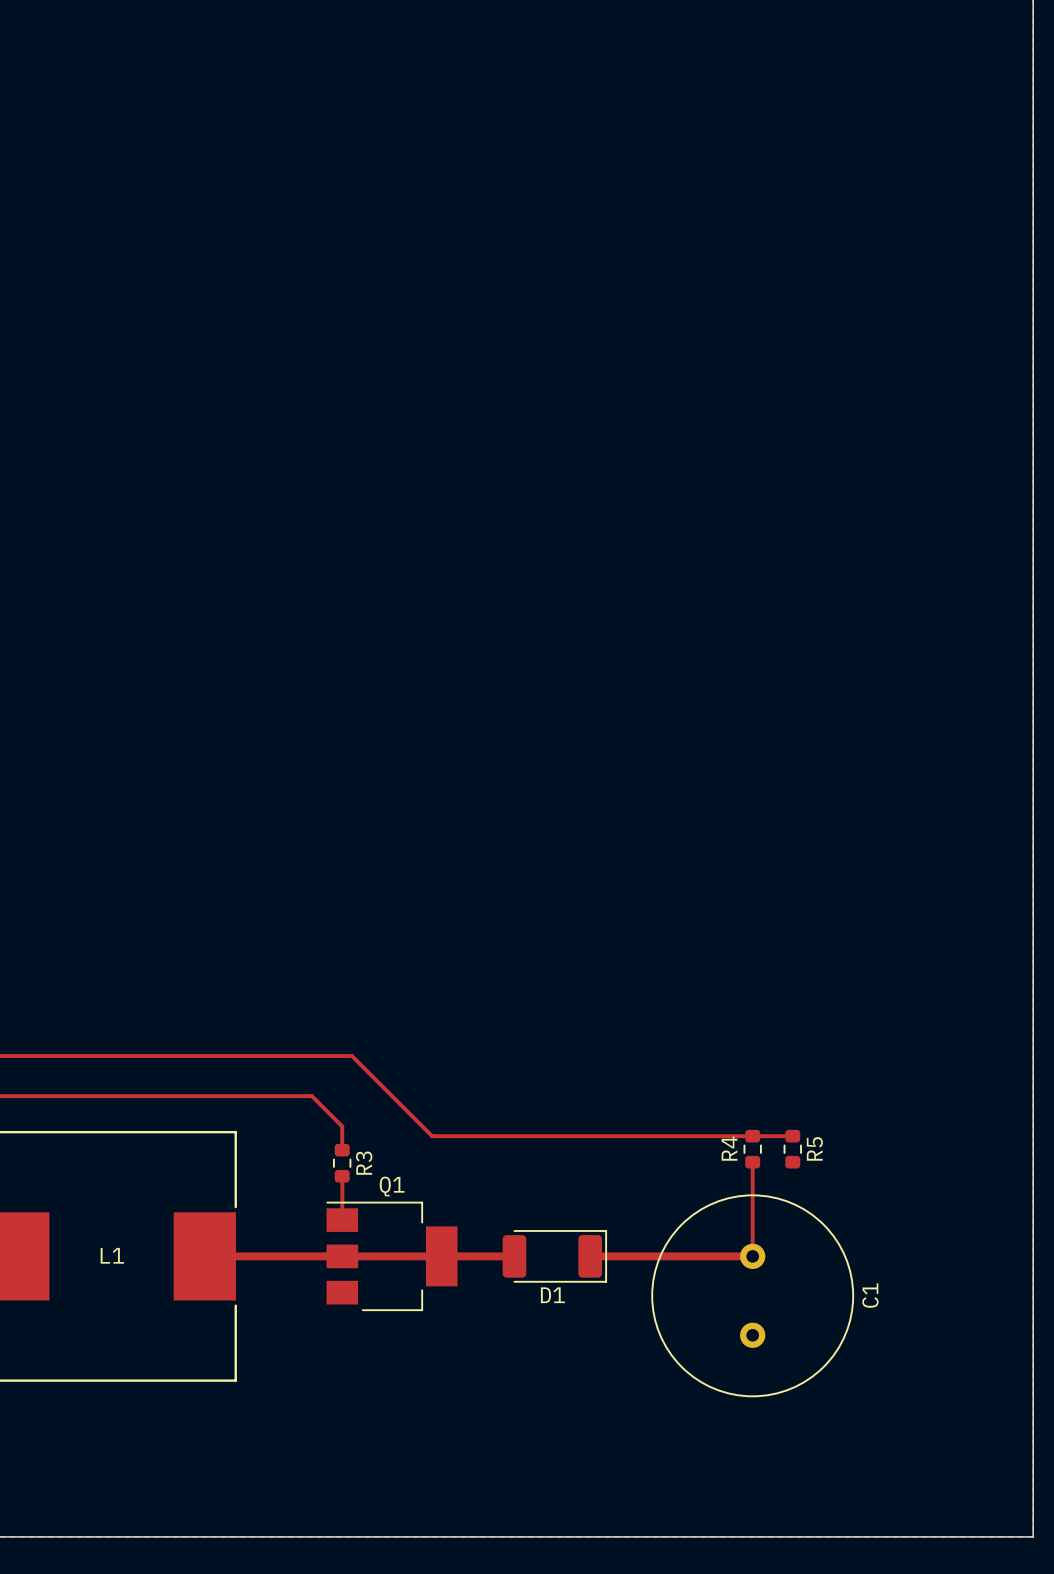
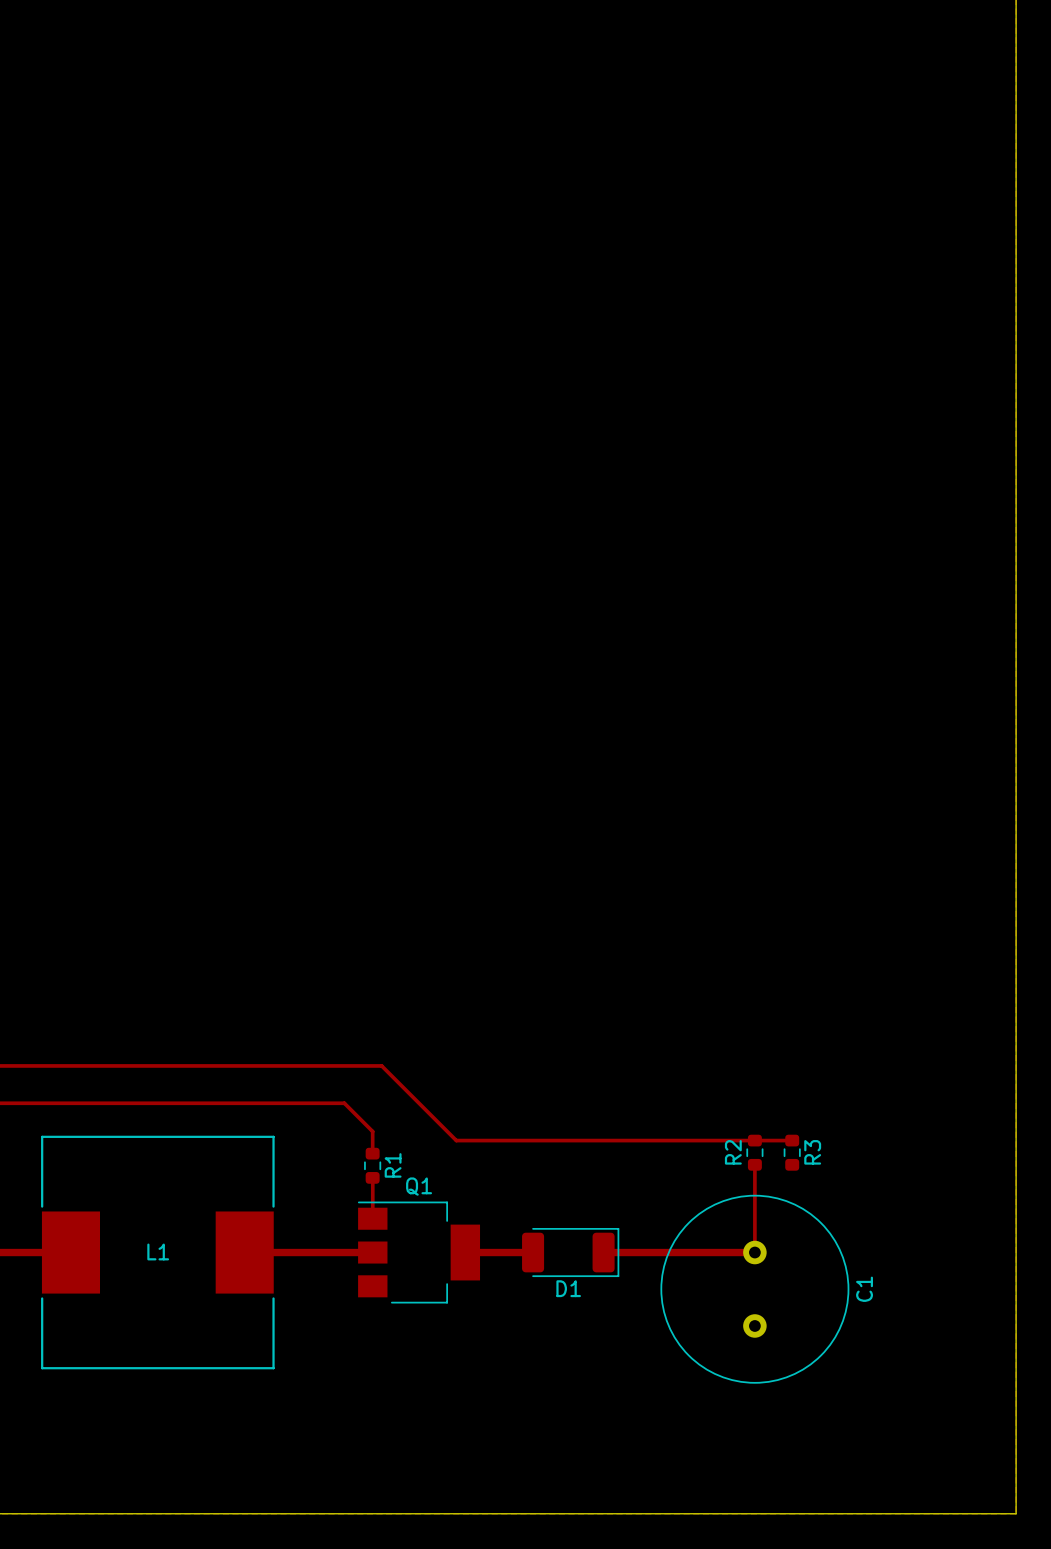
R4 name: R4 (729, 1148) -> R2 (733, 1152)
R5 name: R5 (814, 1148) -> R3 (812, 1152)
R3 name: R3 (364, 1163) -> R1 (393, 1165)
top track: (342, 1256) (441, 1256) -> none

